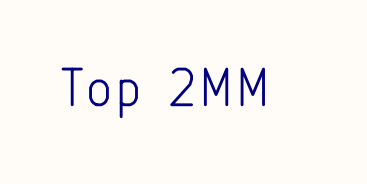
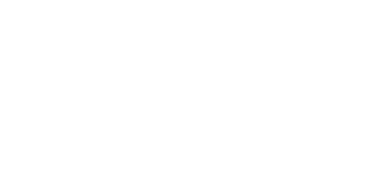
text: Top 2MM (163, 92) -> none

